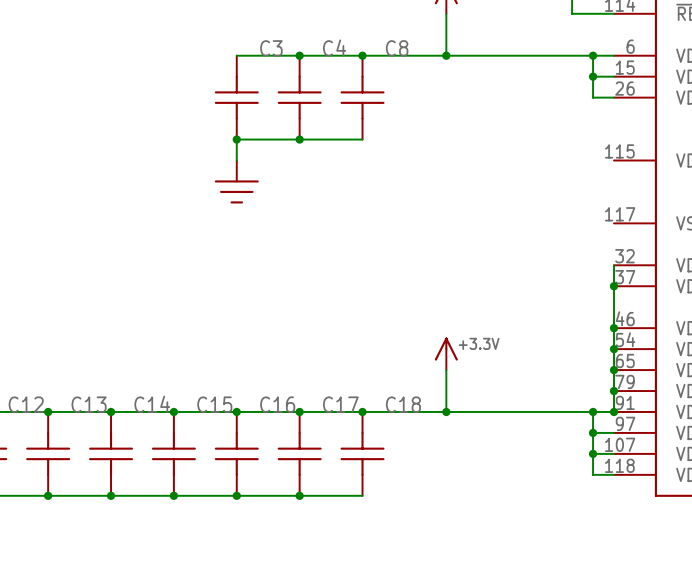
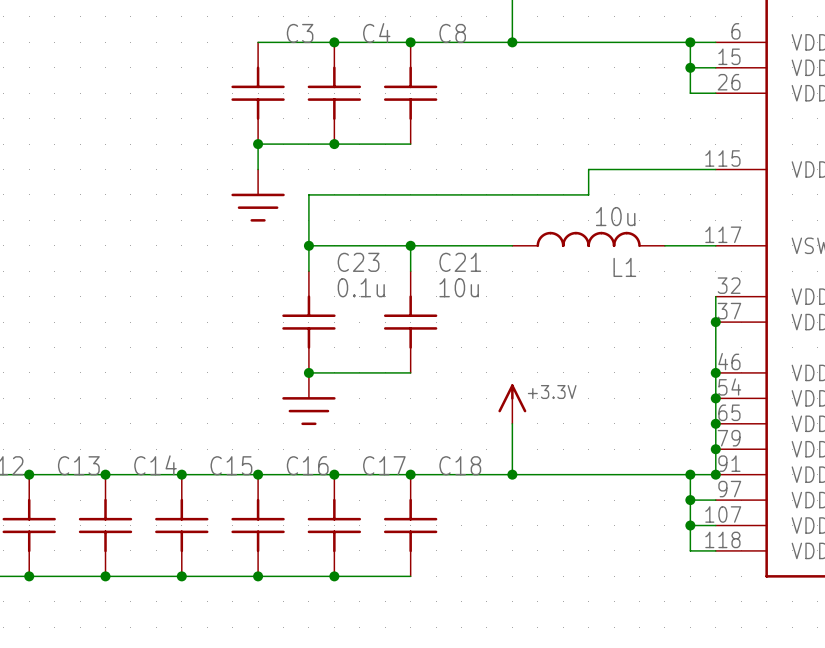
wire: none -> (715, 169) (588, 169) (588, 194) (308, 194) (308, 271)
L1: none -> 10u (588, 239)
wire: none -> (308, 245) (512, 245)
junction: none -> (308, 245)
wire: none -> (410, 245) (410, 271)
junction: none -> (410, 245)
wire: none -> (664, 245) (715, 245)
C23: none -> 0.1u (308, 322)
C21: none -> 10u (410, 322)
wire: none -> (308, 372) (410, 372)
junction: none -> (308, 372)
power symbol: none -> (308, 399)

